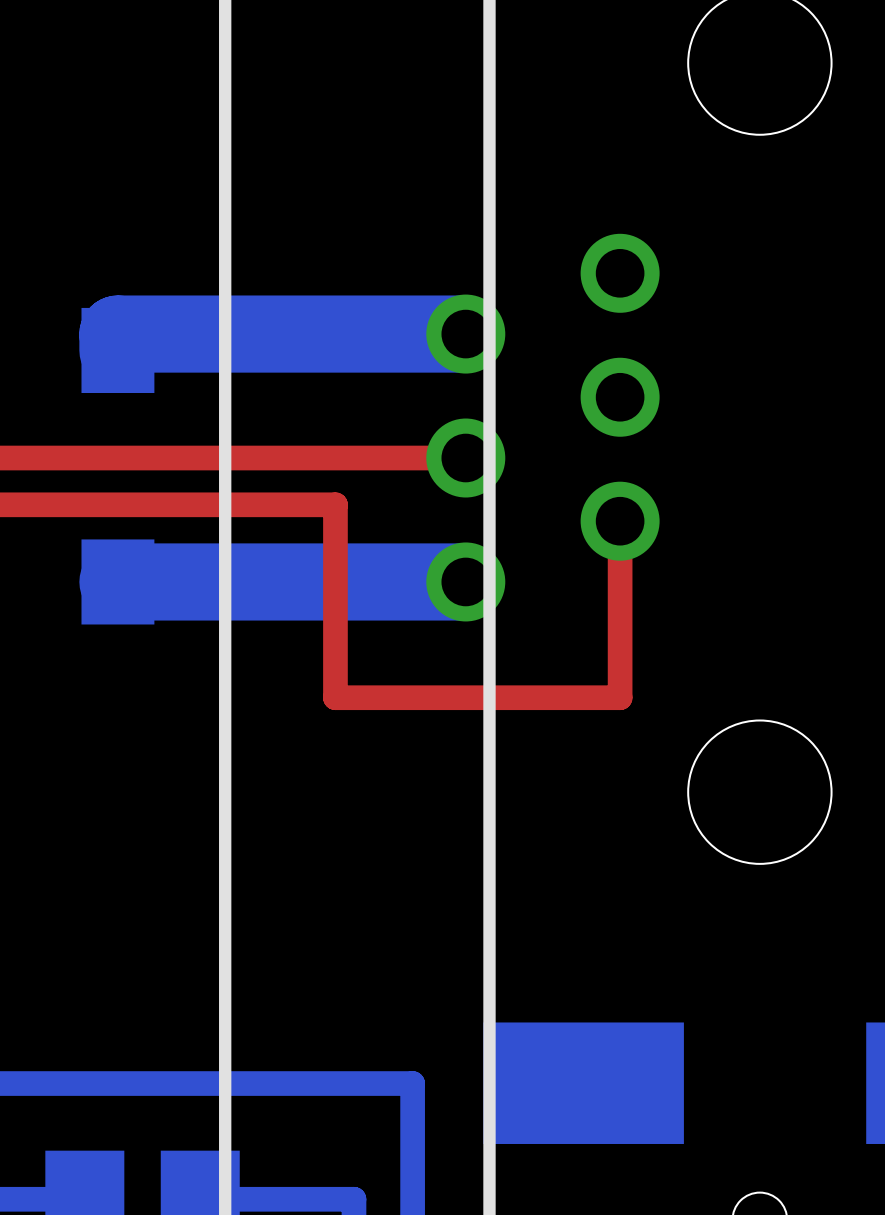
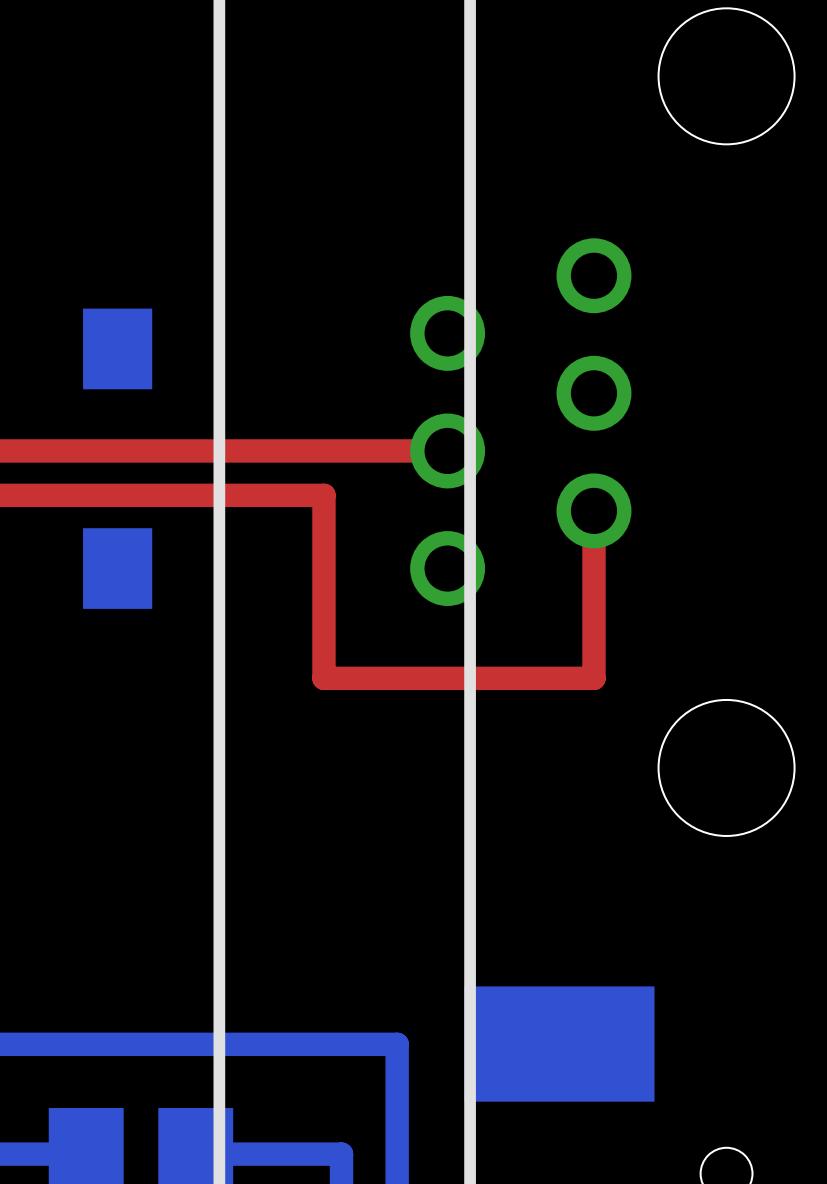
bottom track: (465, 334) (117, 334) (117, 350) -> none
bottom track: (117, 581) (465, 581) -> none

